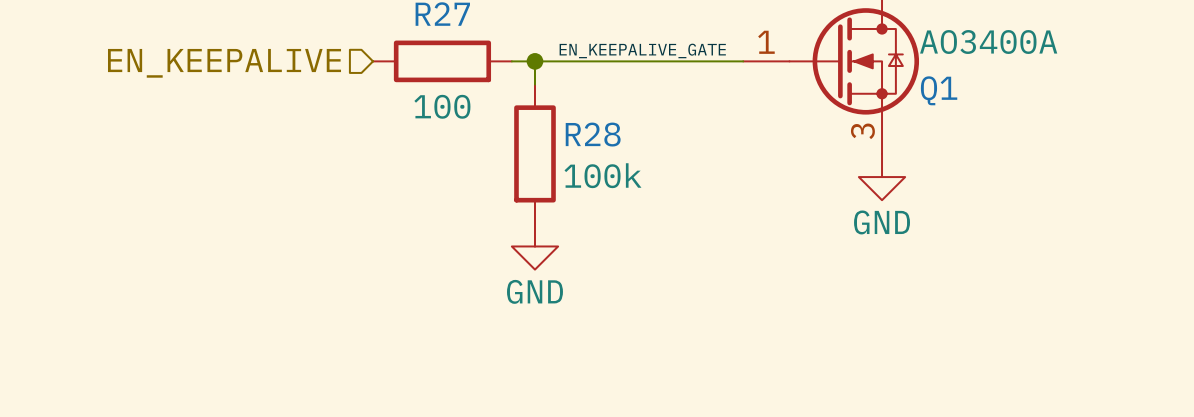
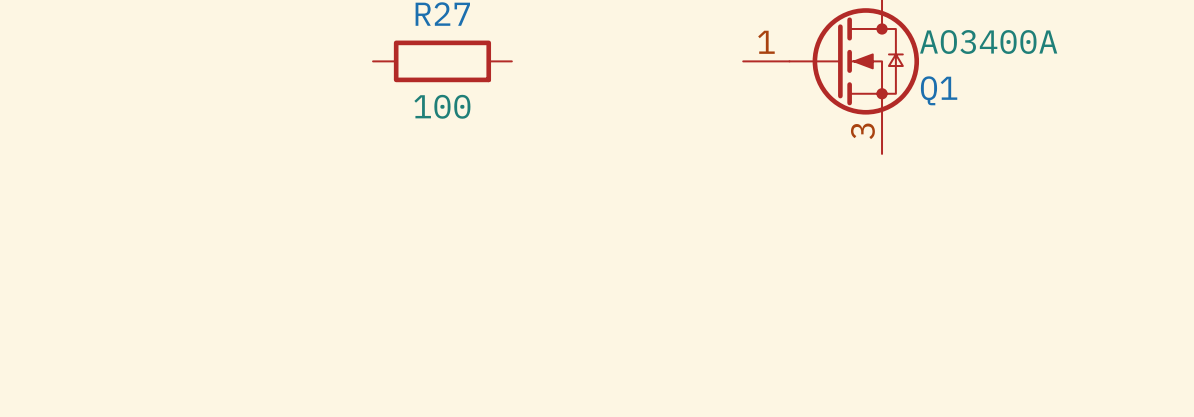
label: EN_KEEPALIVE_GATE (642, 50) -> none
wire: (511, 61) (743, 61) -> none
wire: (534, 61) (534, 84) -> none
junction: (534, 61) -> none
hierarchical label: EN_KEEPALIVE (224, 63) -> none
R28: 100k (534, 153) -> none
power symbol: GND (882, 177) -> none
power symbol: GND (534, 246) -> none

